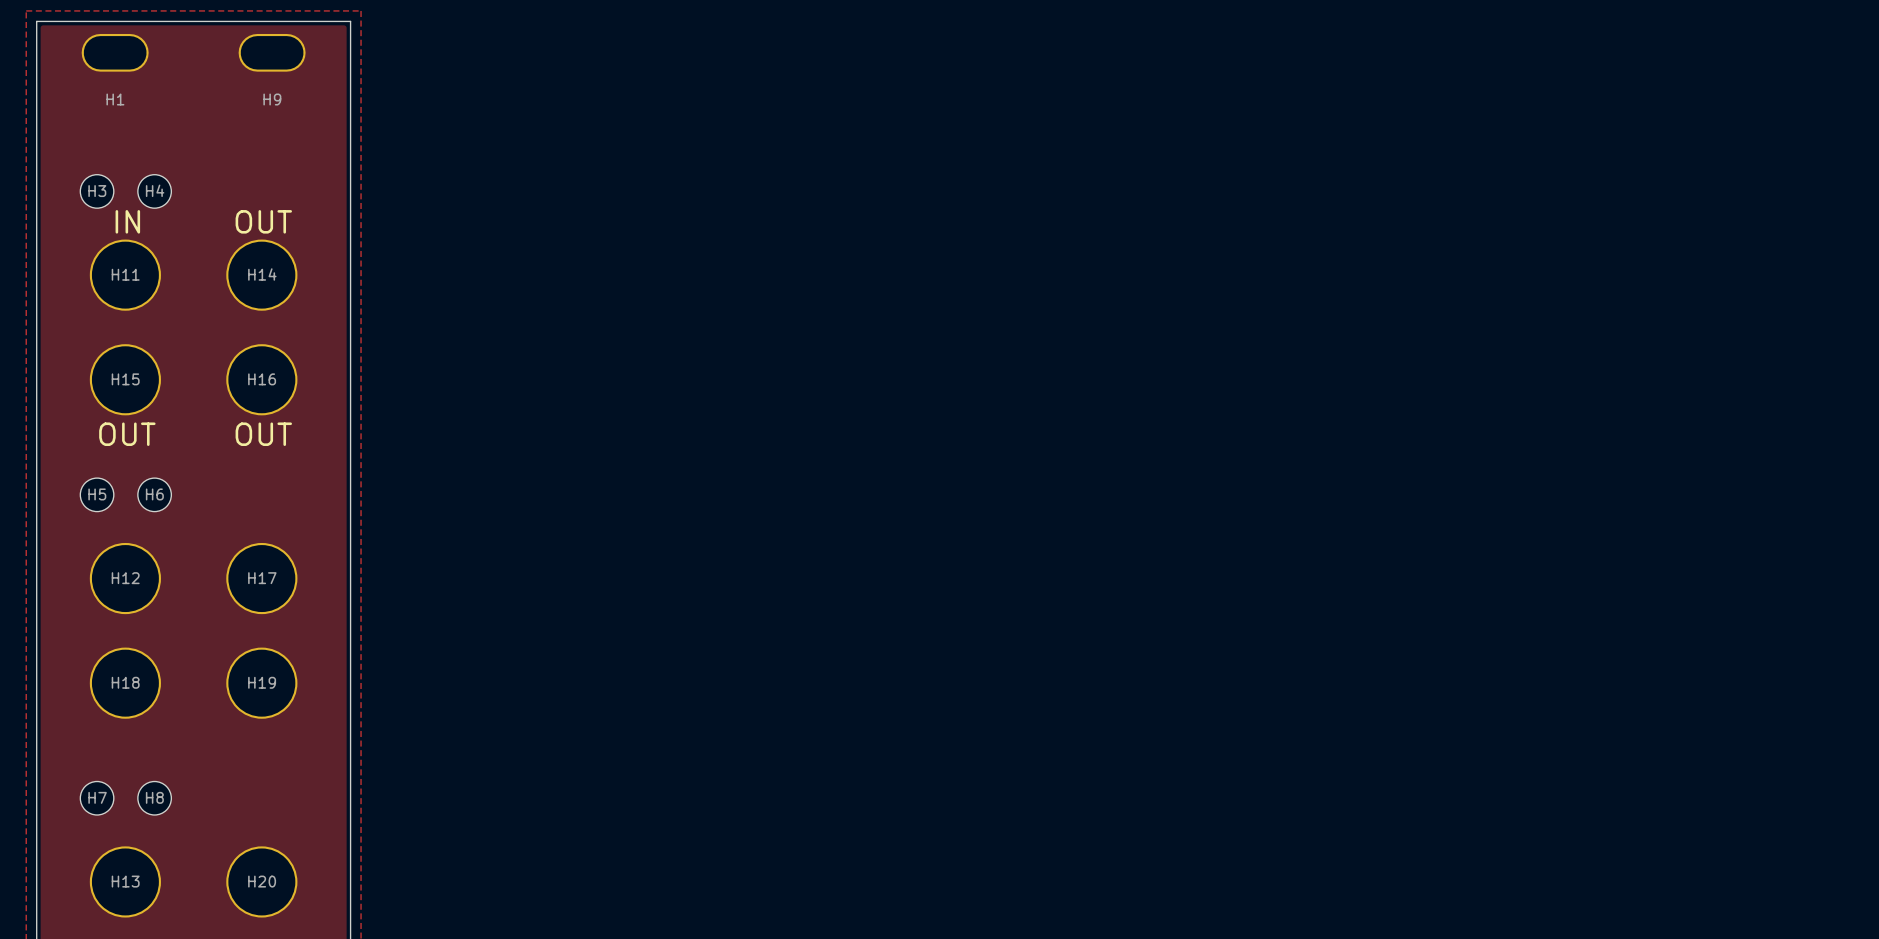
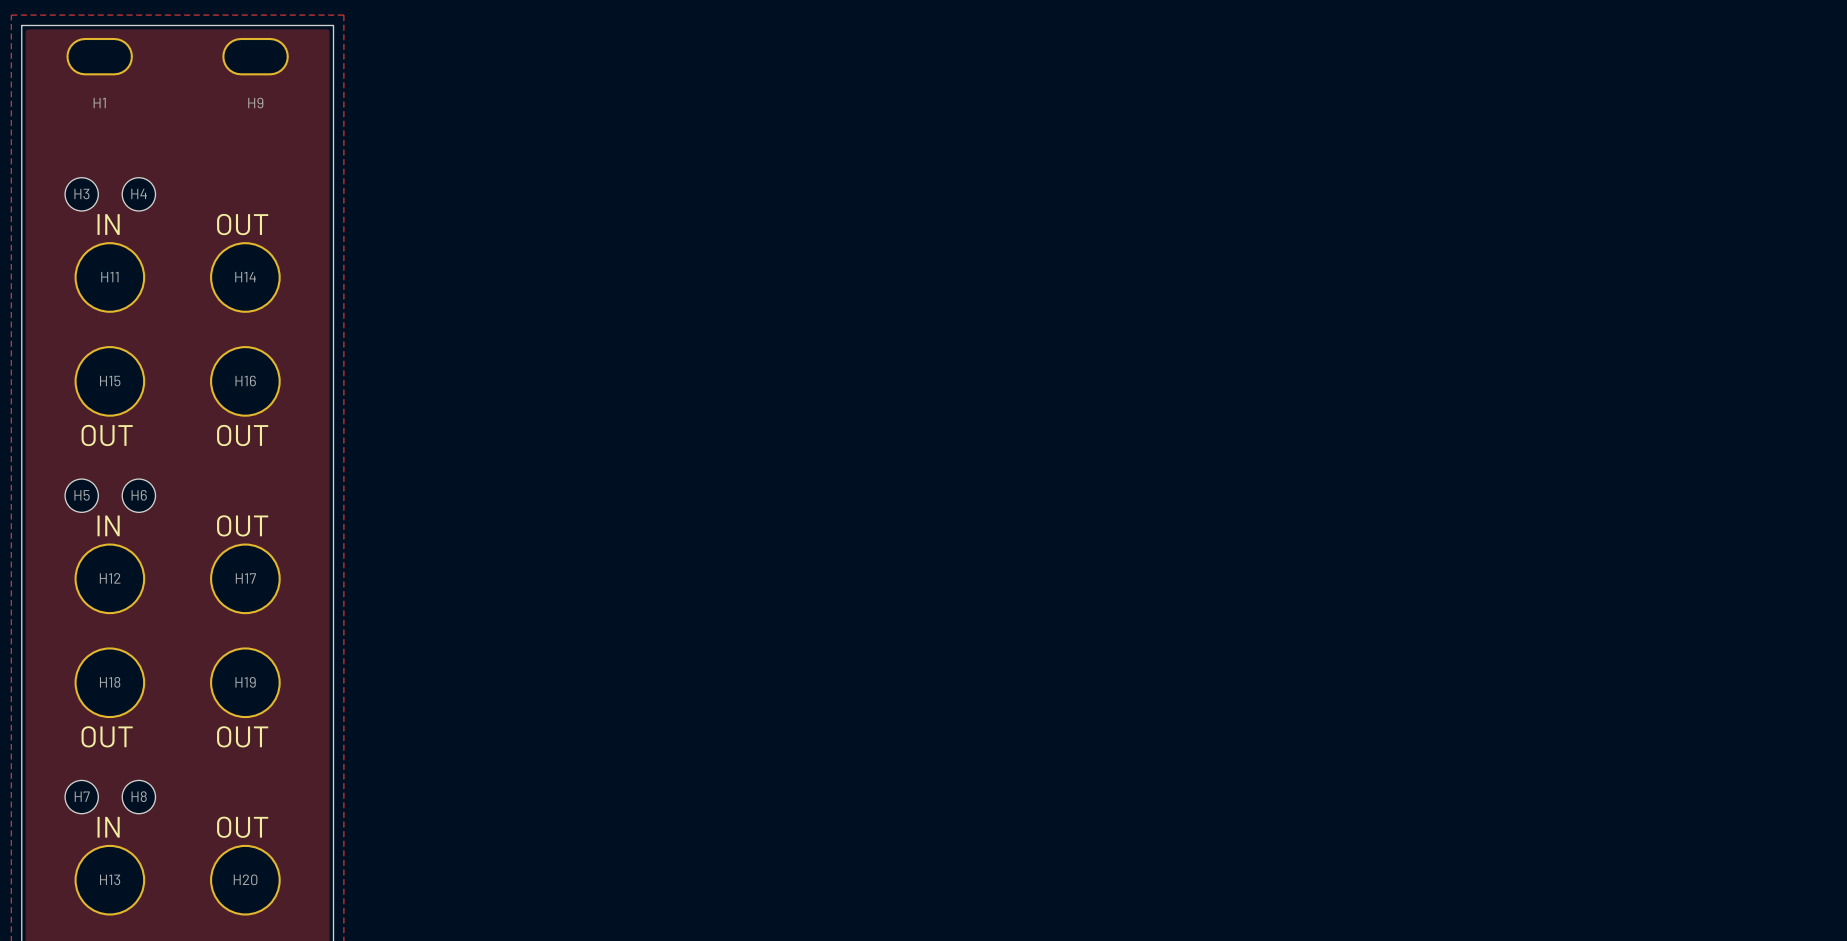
text: none -> IN (108, 525)
text: none -> OUT (242, 525)
text: none -> OUT (107, 736)
text: none -> OUT (242, 736)
text: none -> IN (108, 827)
text: none -> OUT (242, 827)

